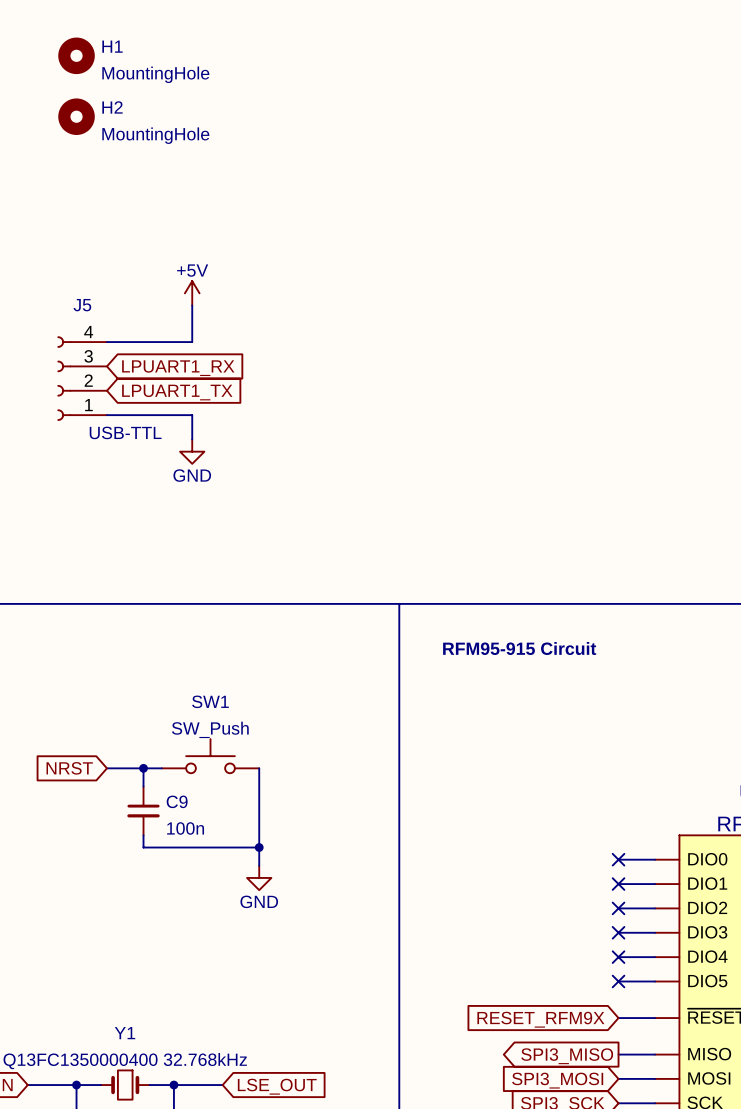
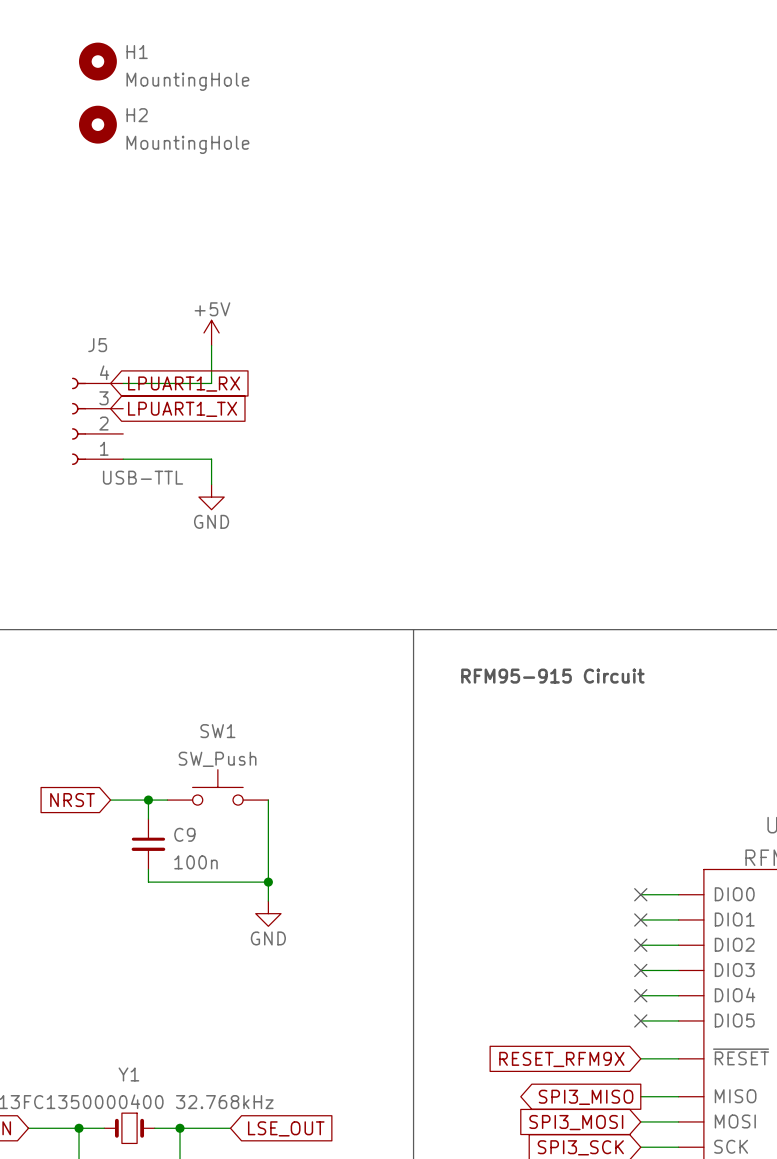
H1 position: (76, 55) -> (97, 61)
H2 position: (76, 116) -> (97, 124)
power symbol position: +5V (192, 293) -> +5V (211, 332)
wire: (192, 305) (192, 342) (106, 342) -> (211, 345) (211, 383) (123, 383)
J5 position: (82, 378) -> (97, 421)
wire: (106, 415) (192, 415) (192, 439) -> (123, 459) (211, 459) (211, 484)
power symbol position: GND (192, 451) -> GND (211, 497)

